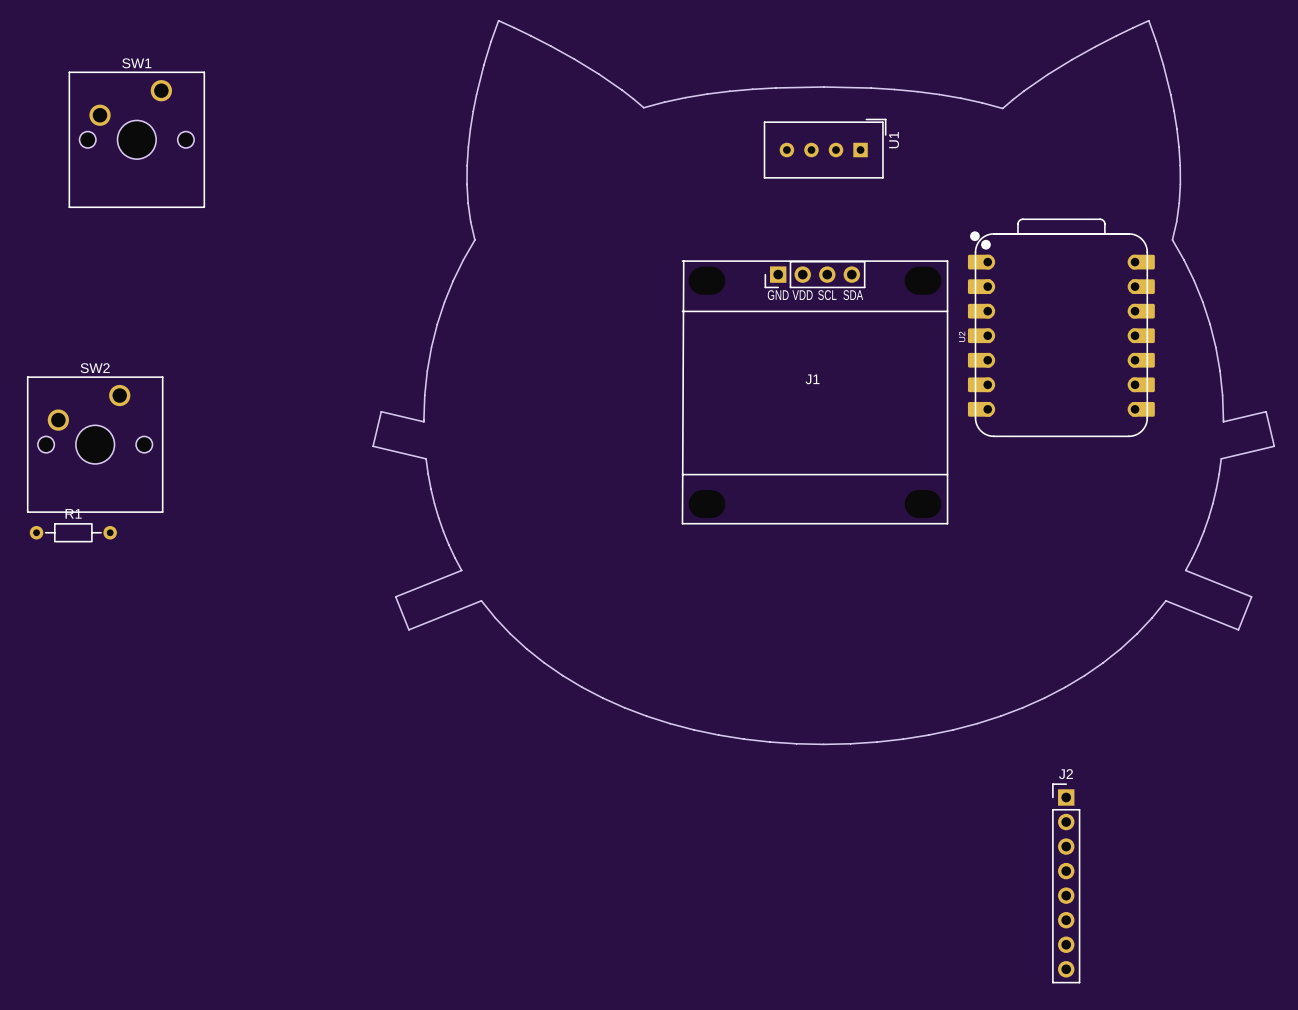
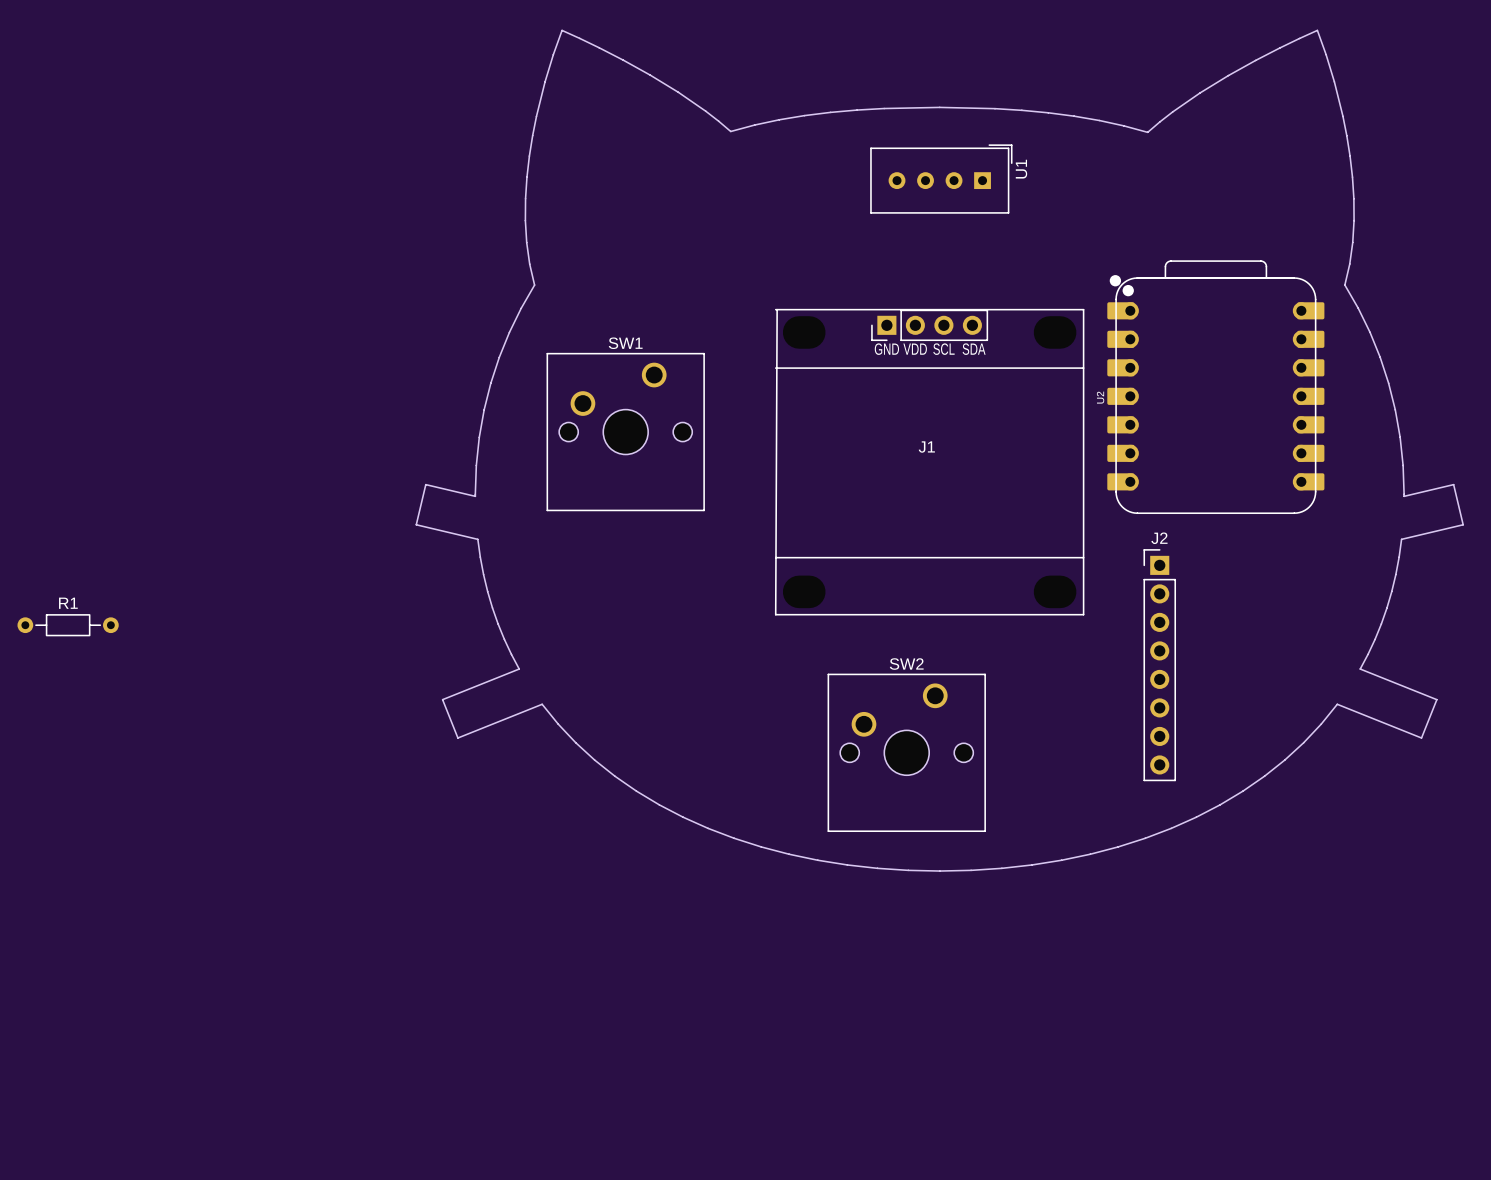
SW1 position: (136, 139) -> (625, 432)
SW2 position: (95, 444) -> (906, 752)
J2 position: (1066, 883) -> (1159, 665)

